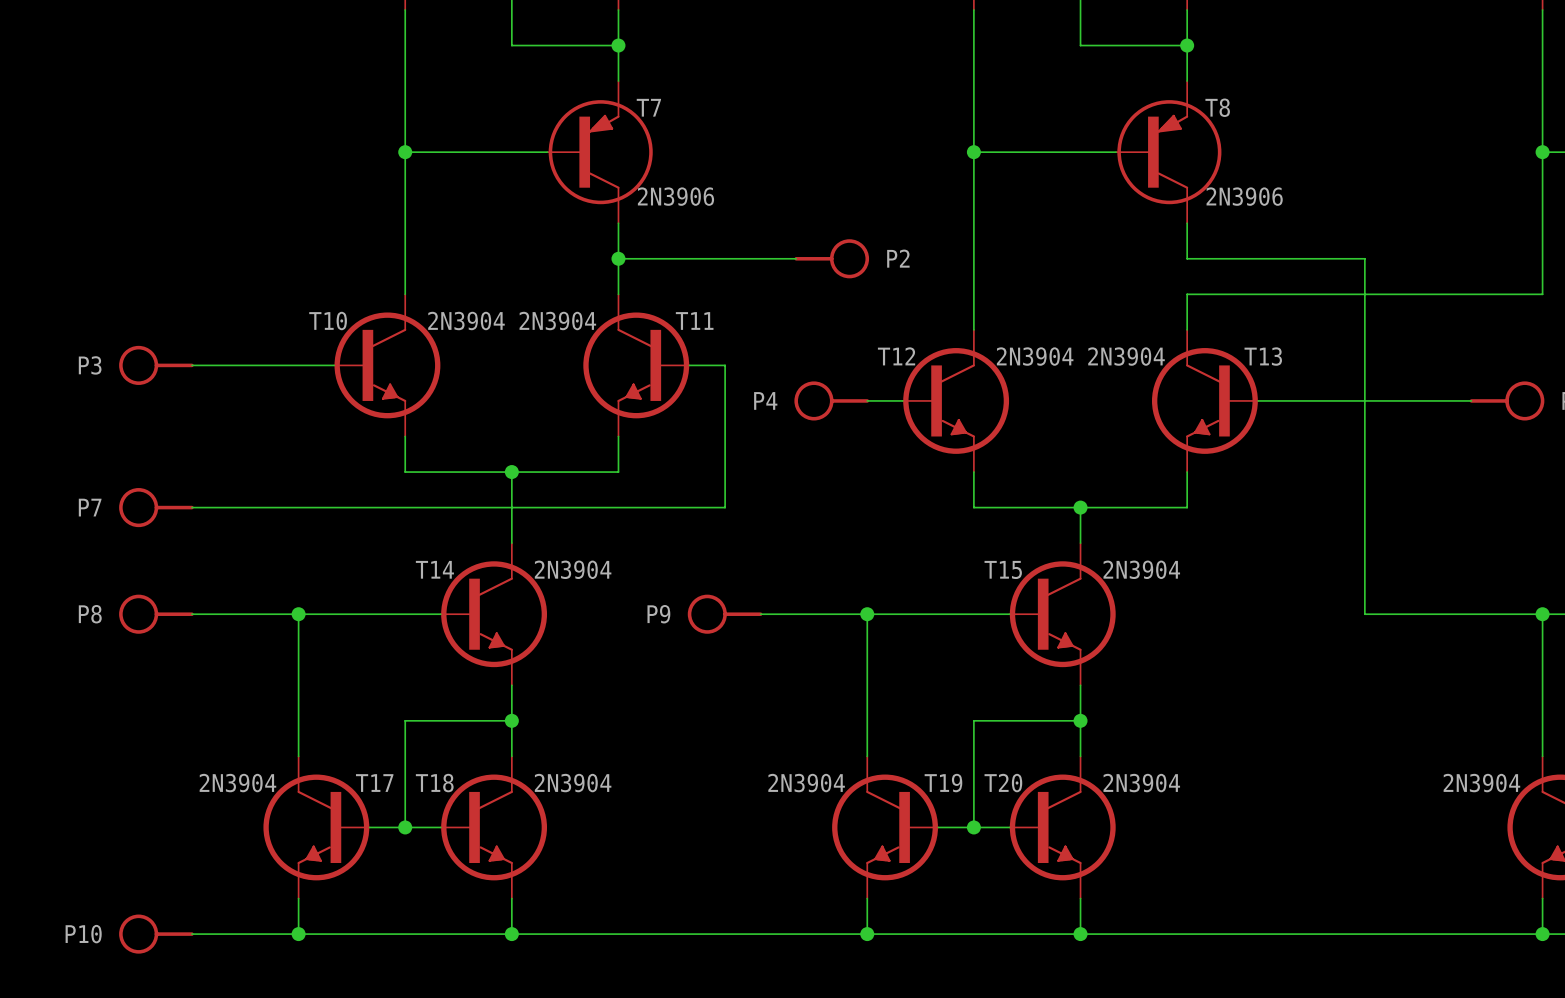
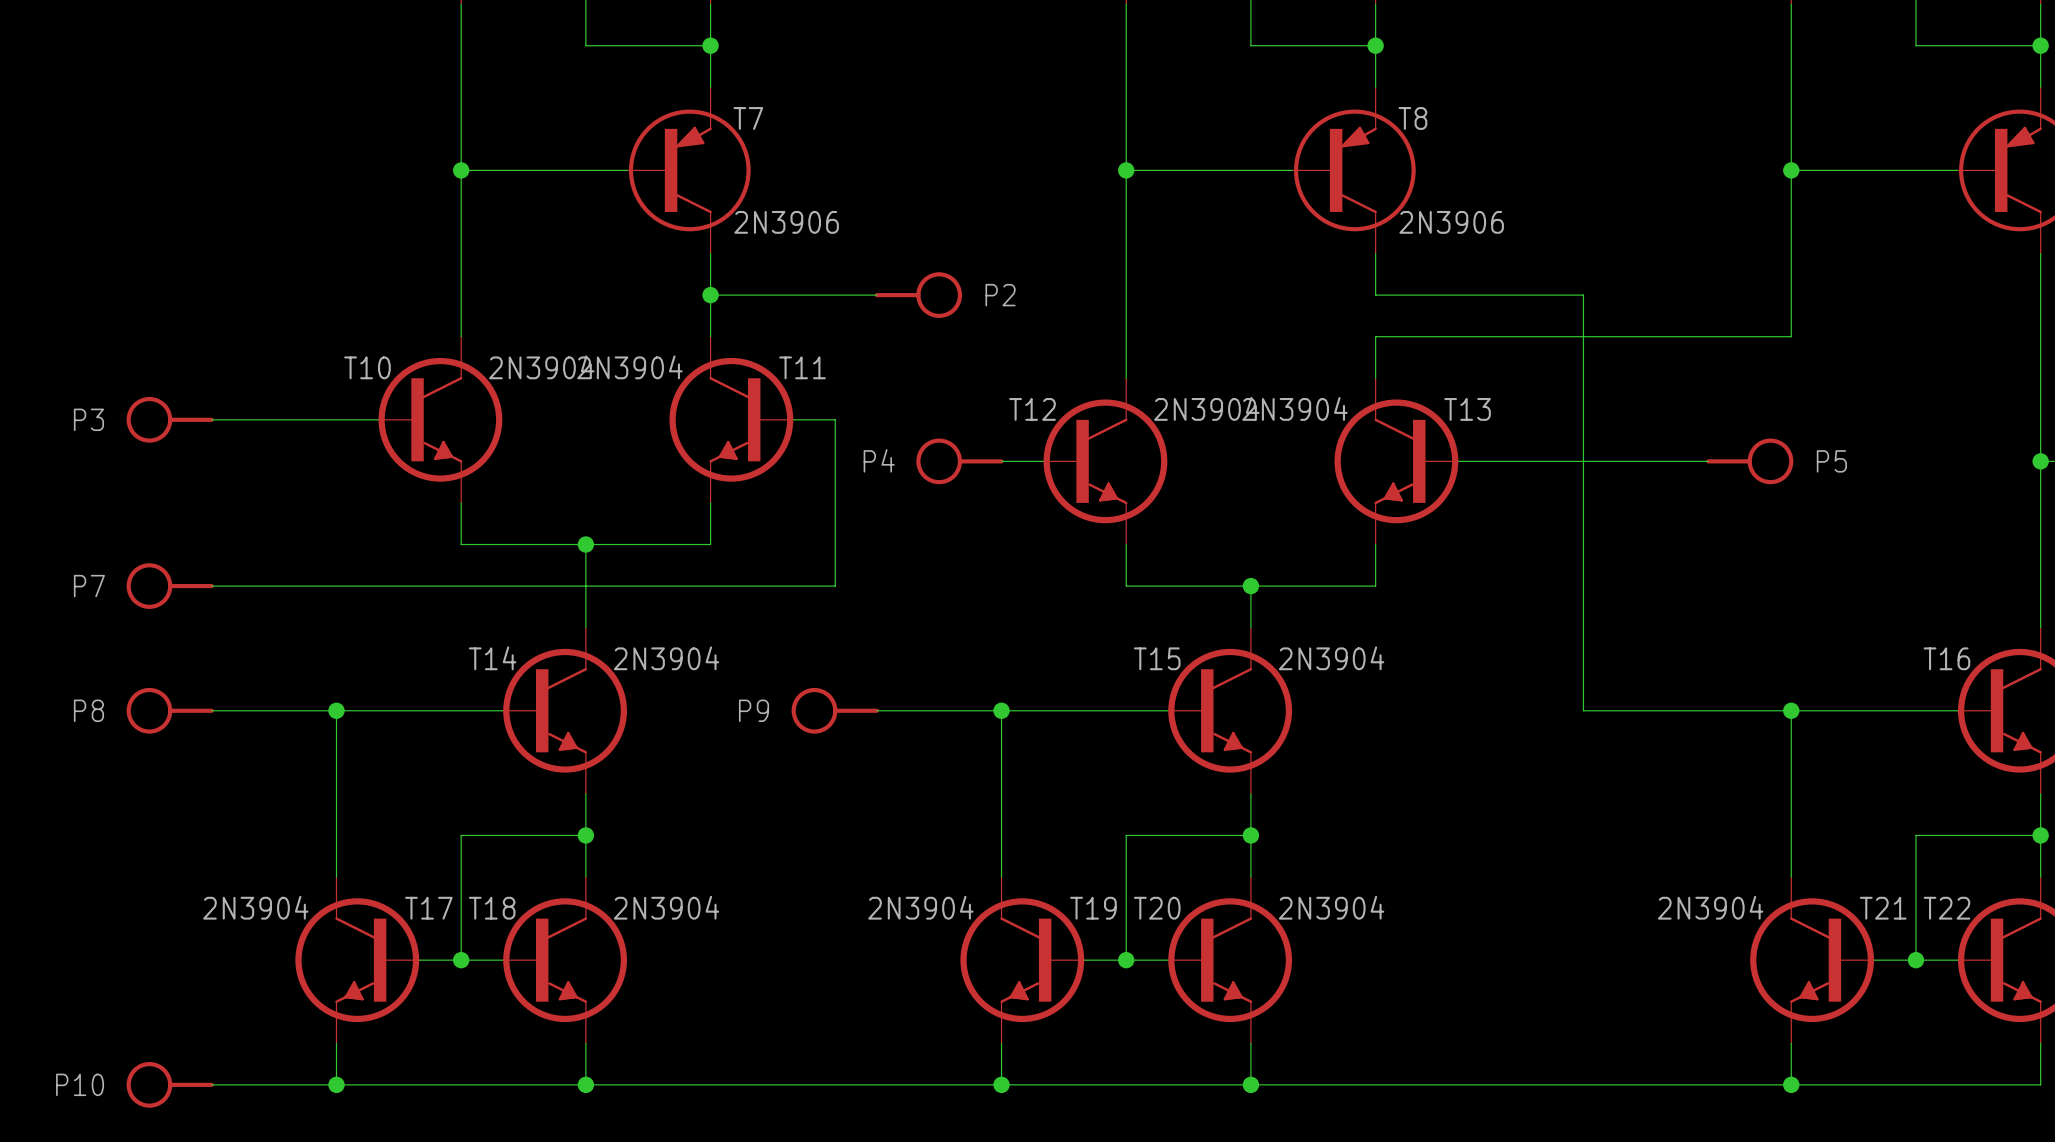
P2 position: (831, 258) -> (918, 295)

